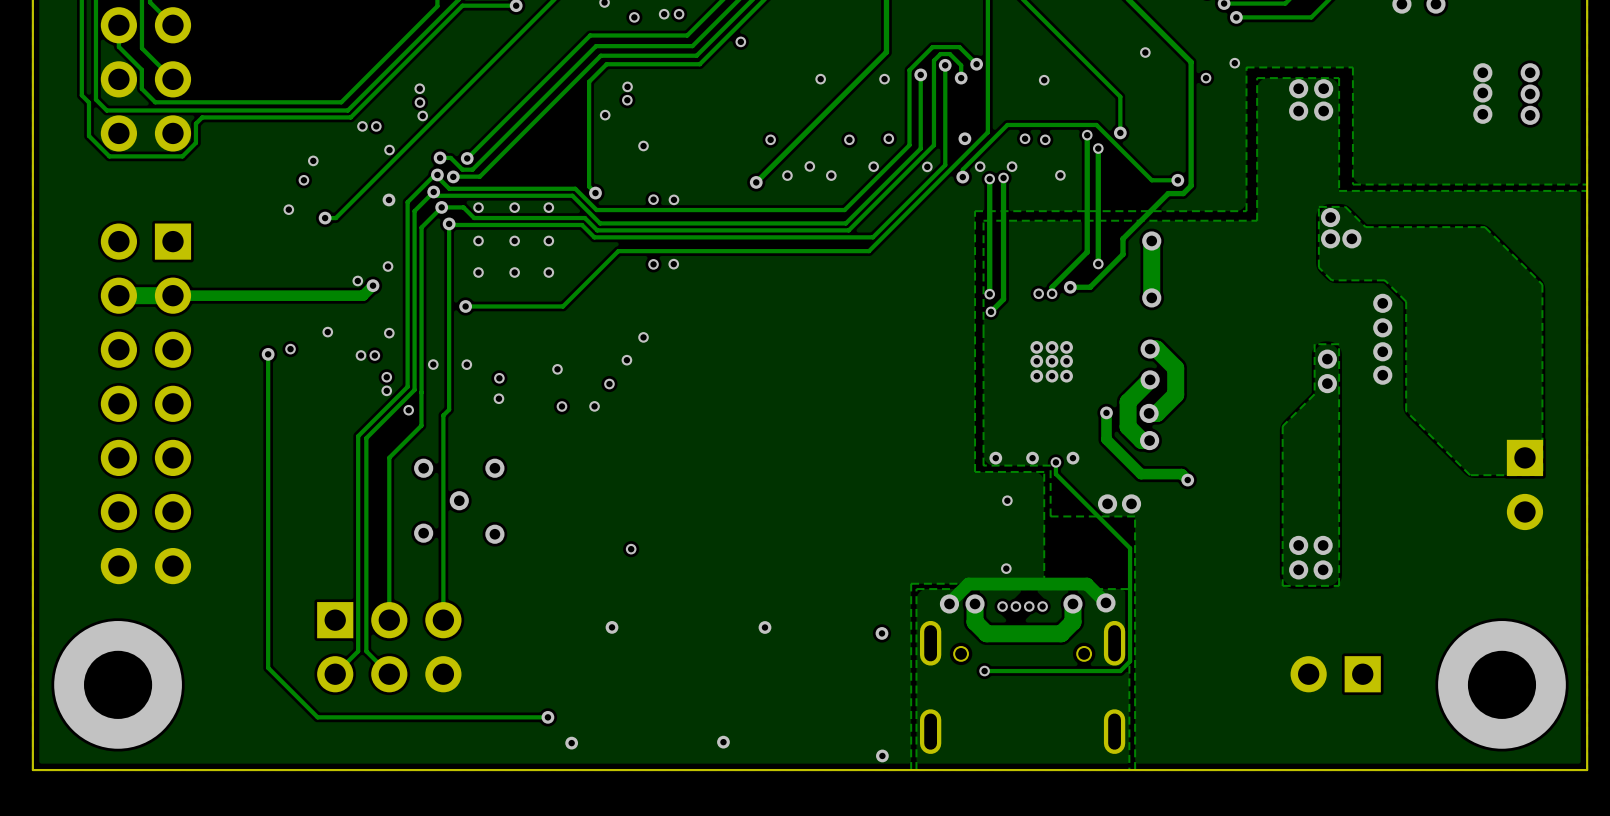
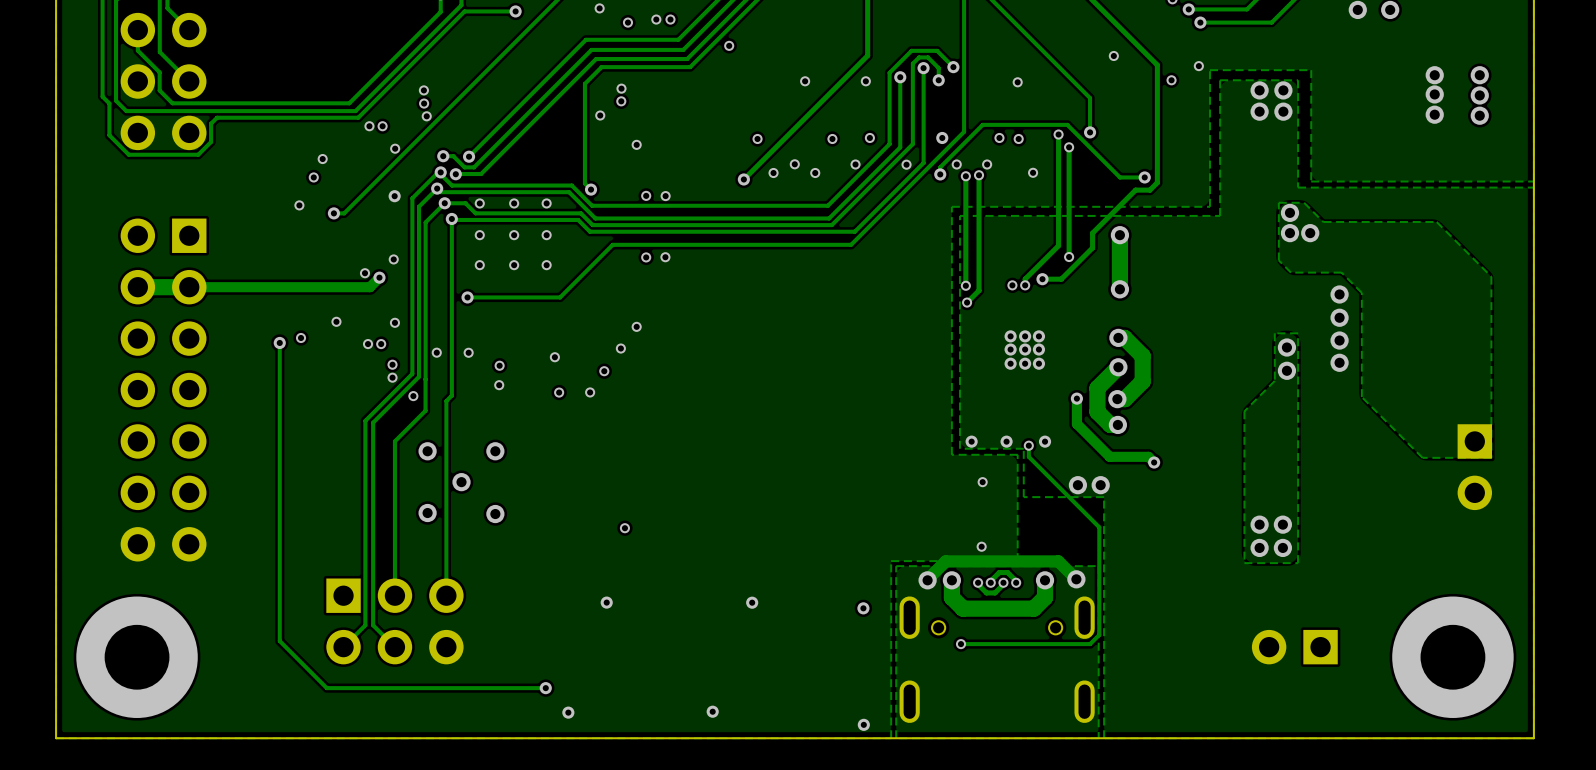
track: none -> (1016, 581) (1007, 572) (999, 572) (990, 581)
track: none -> (1003, 584) (994, 592) (986, 592) (978, 584)

